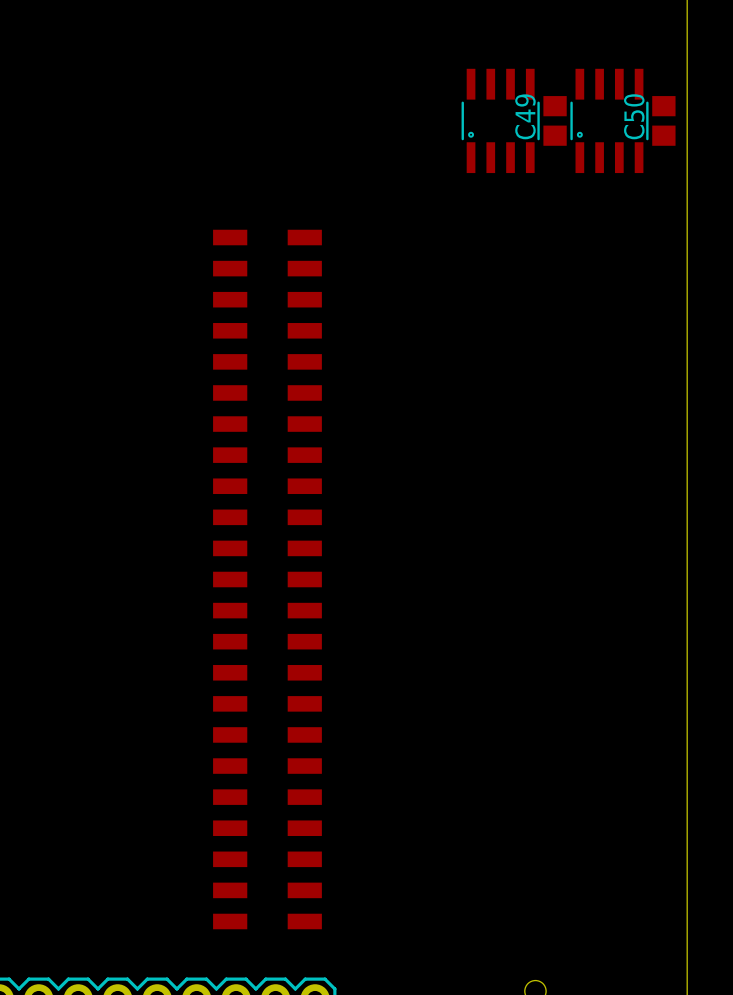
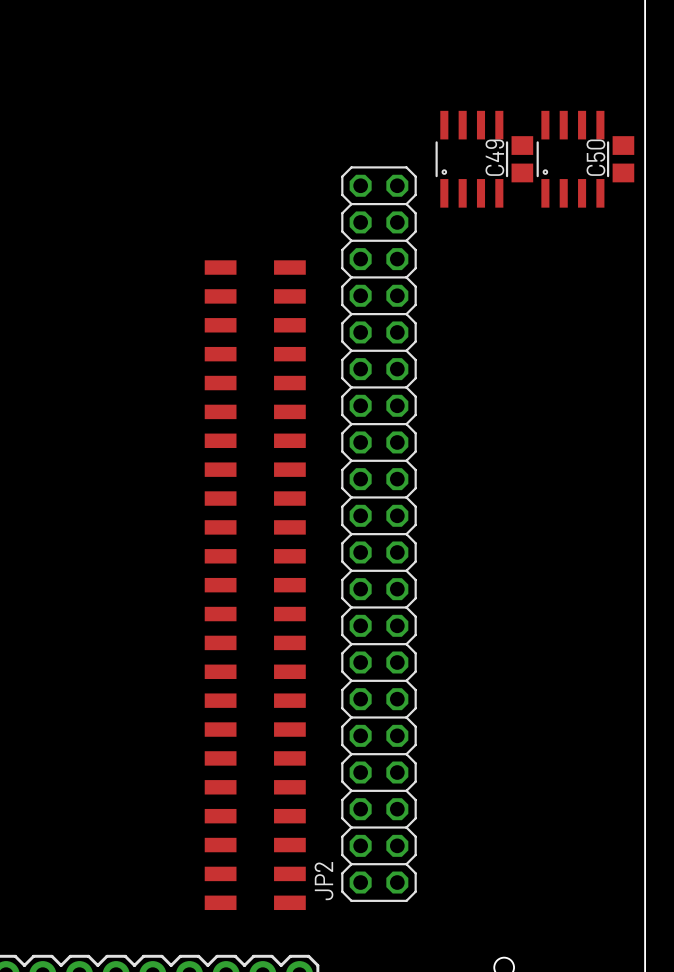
JP2: none -> (378, 534)

